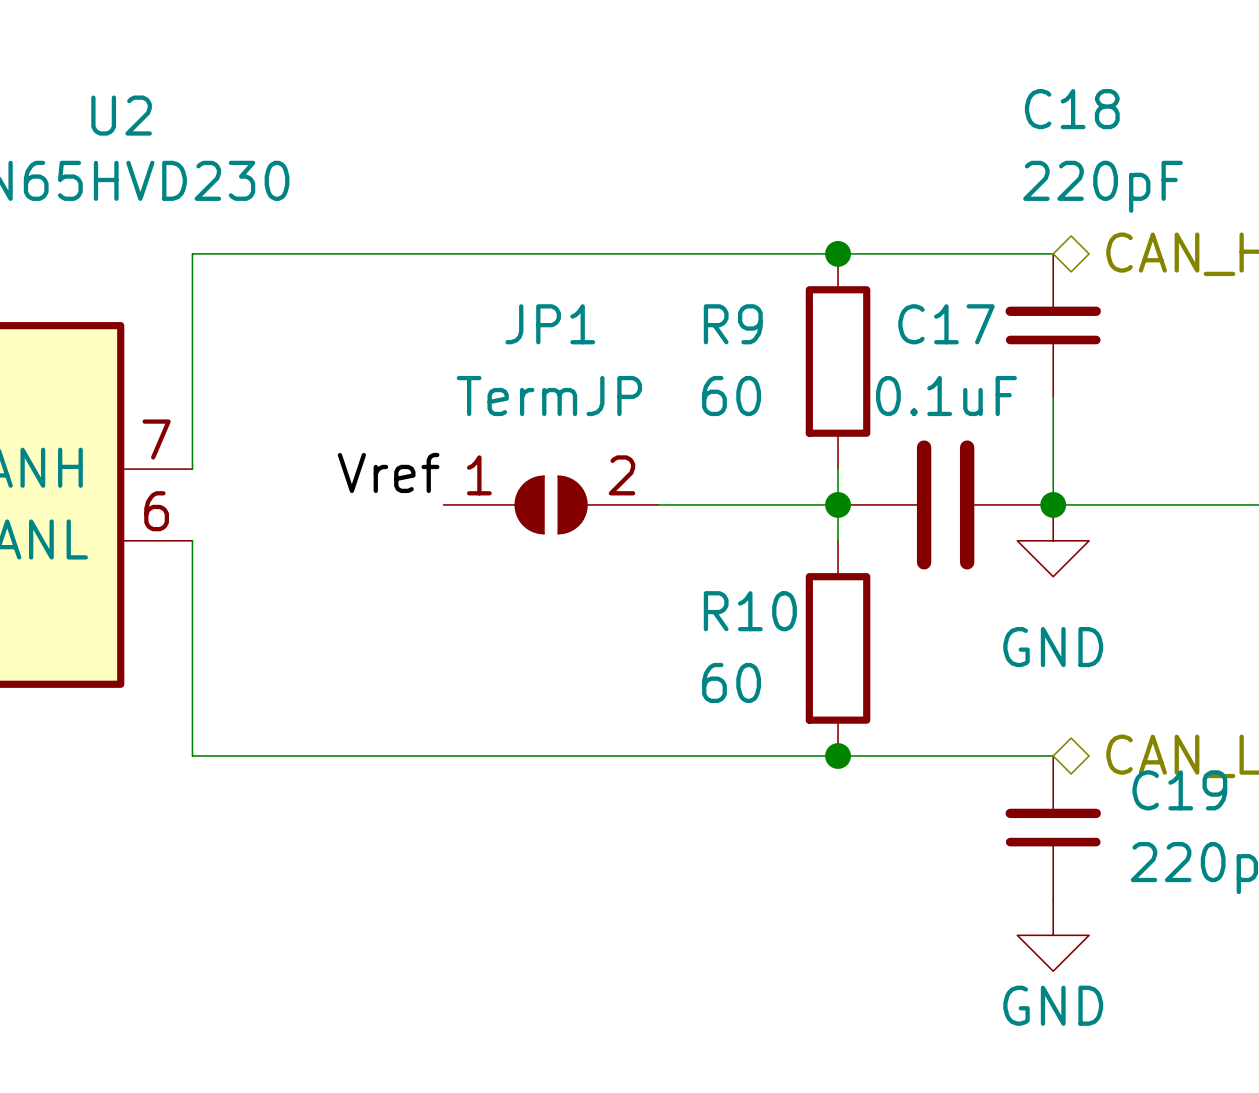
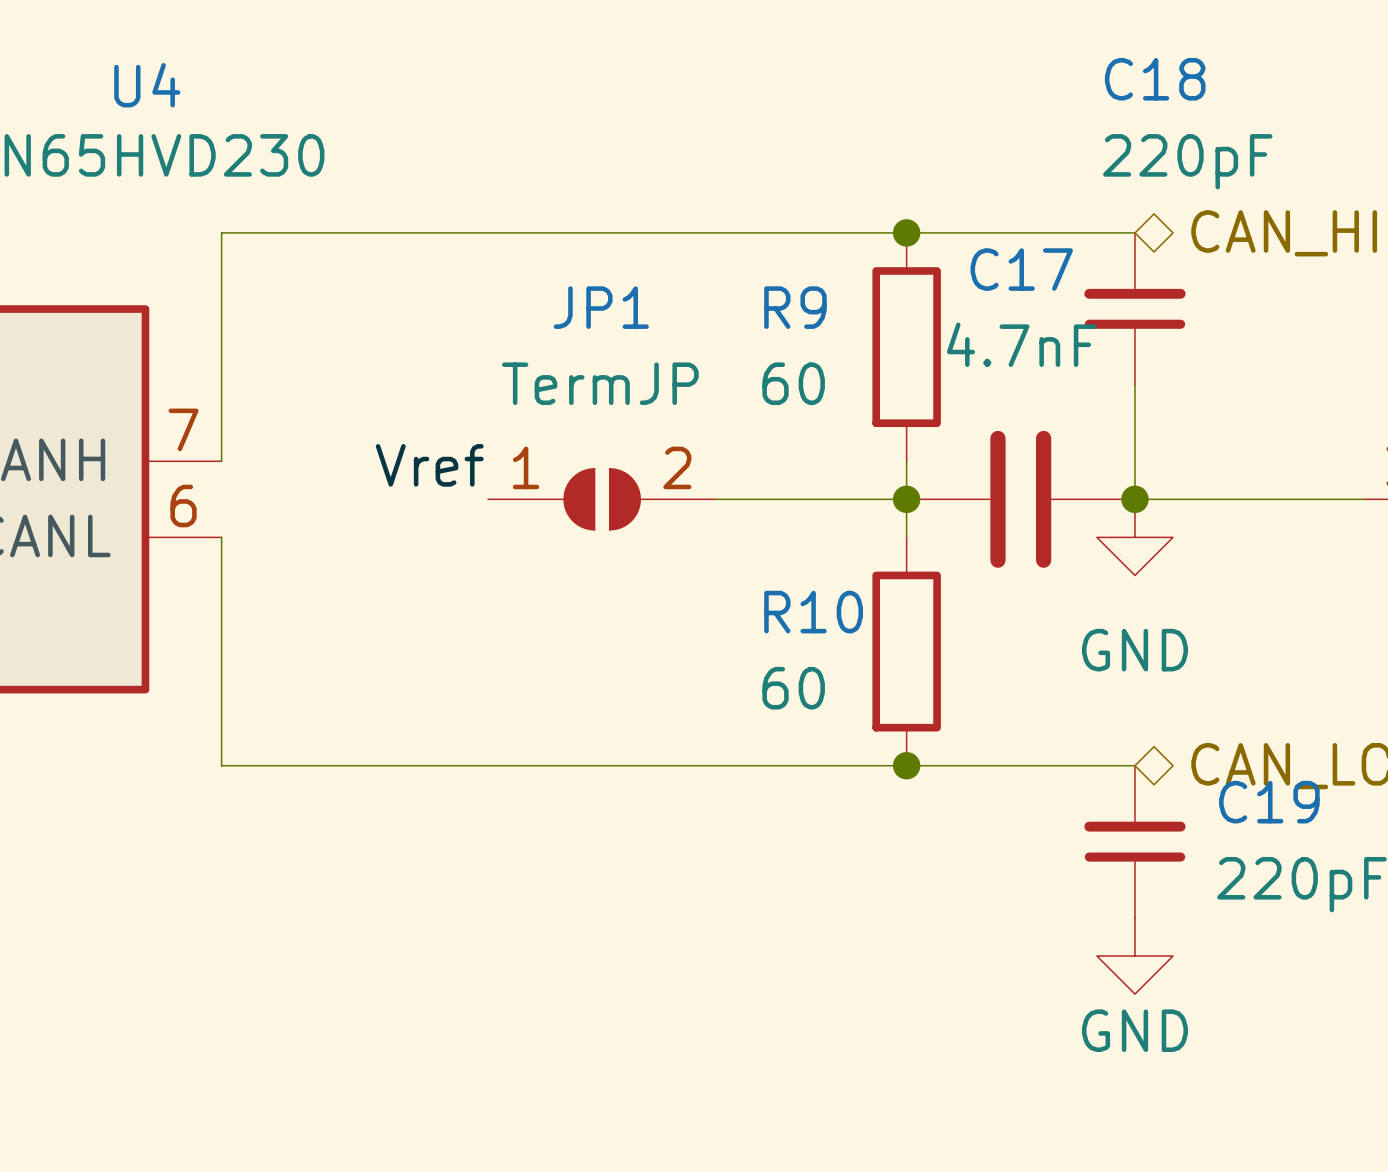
U2 name: U2 (121, 115) -> U4 (147, 85)
C17 name position: C17 (946, 324) -> C17 (1021, 269)
C17 value: 0.1uF (946, 396) -> 4.7nF (1021, 344)

